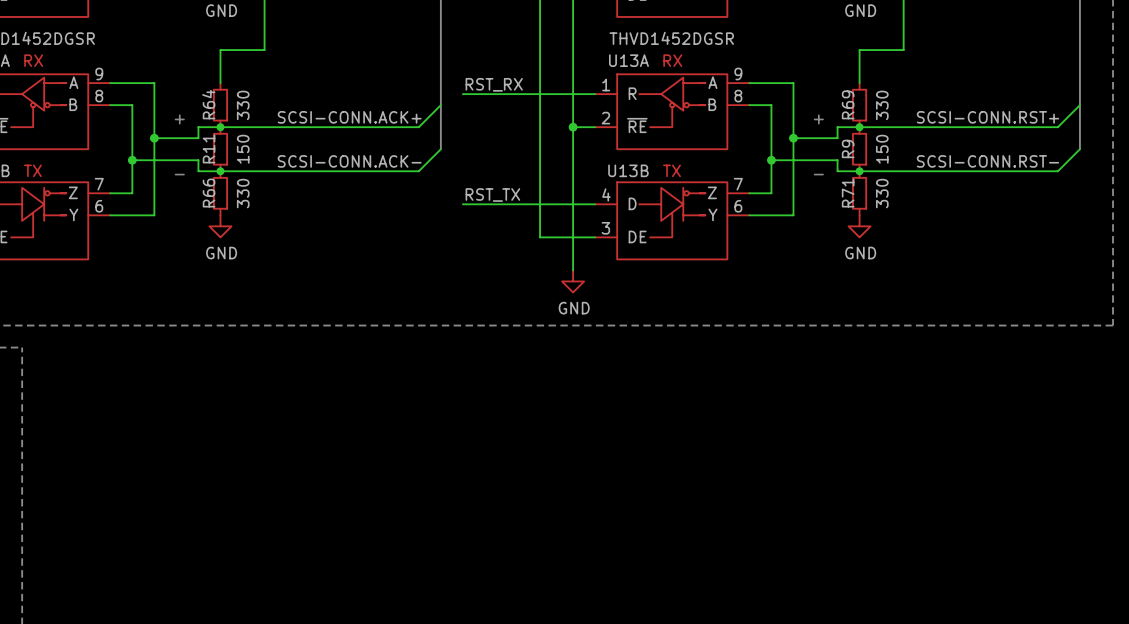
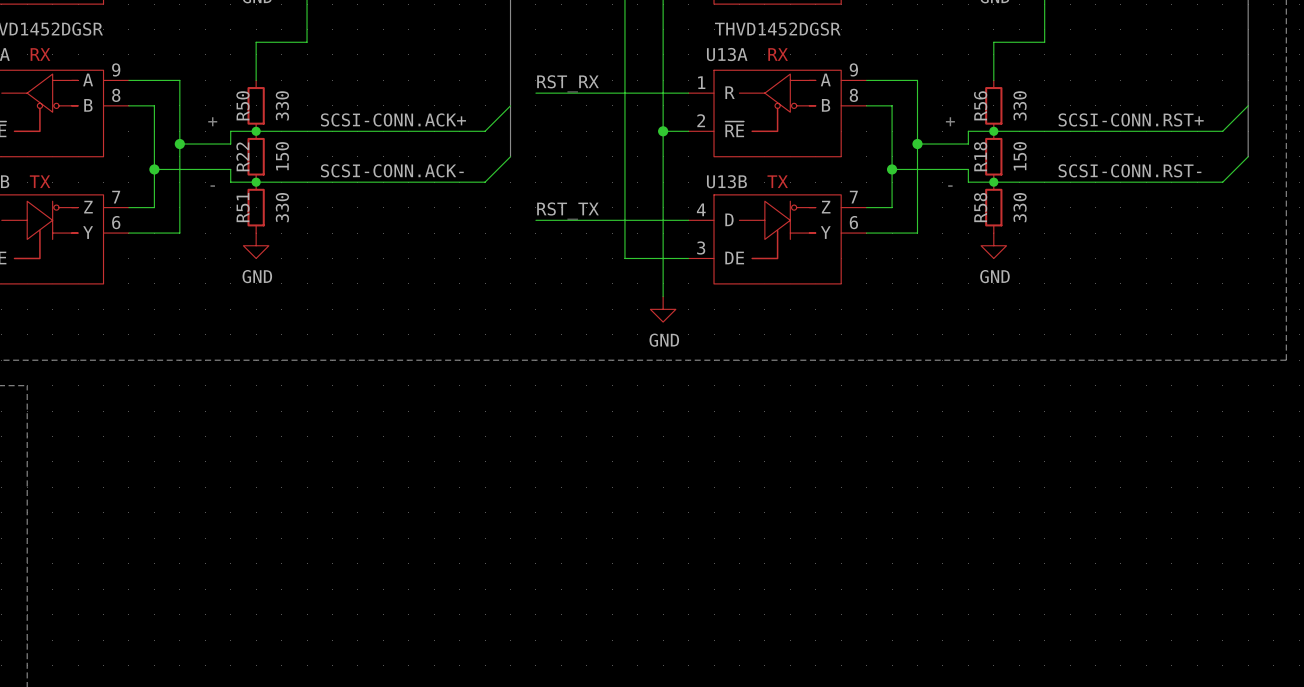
R64 name: R64 (208, 104) -> R50 (242, 105)
R69 name: R69 (848, 104) -> R56 (980, 105)
R11 name: R11 (209, 148) -> R22 (242, 156)
R9 name: R9 (848, 148) -> R18 (980, 156)
R66 name: R66 (209, 193) -> R51 (243, 207)
R71 name: R71 (848, 193) -> R58 (980, 207)

